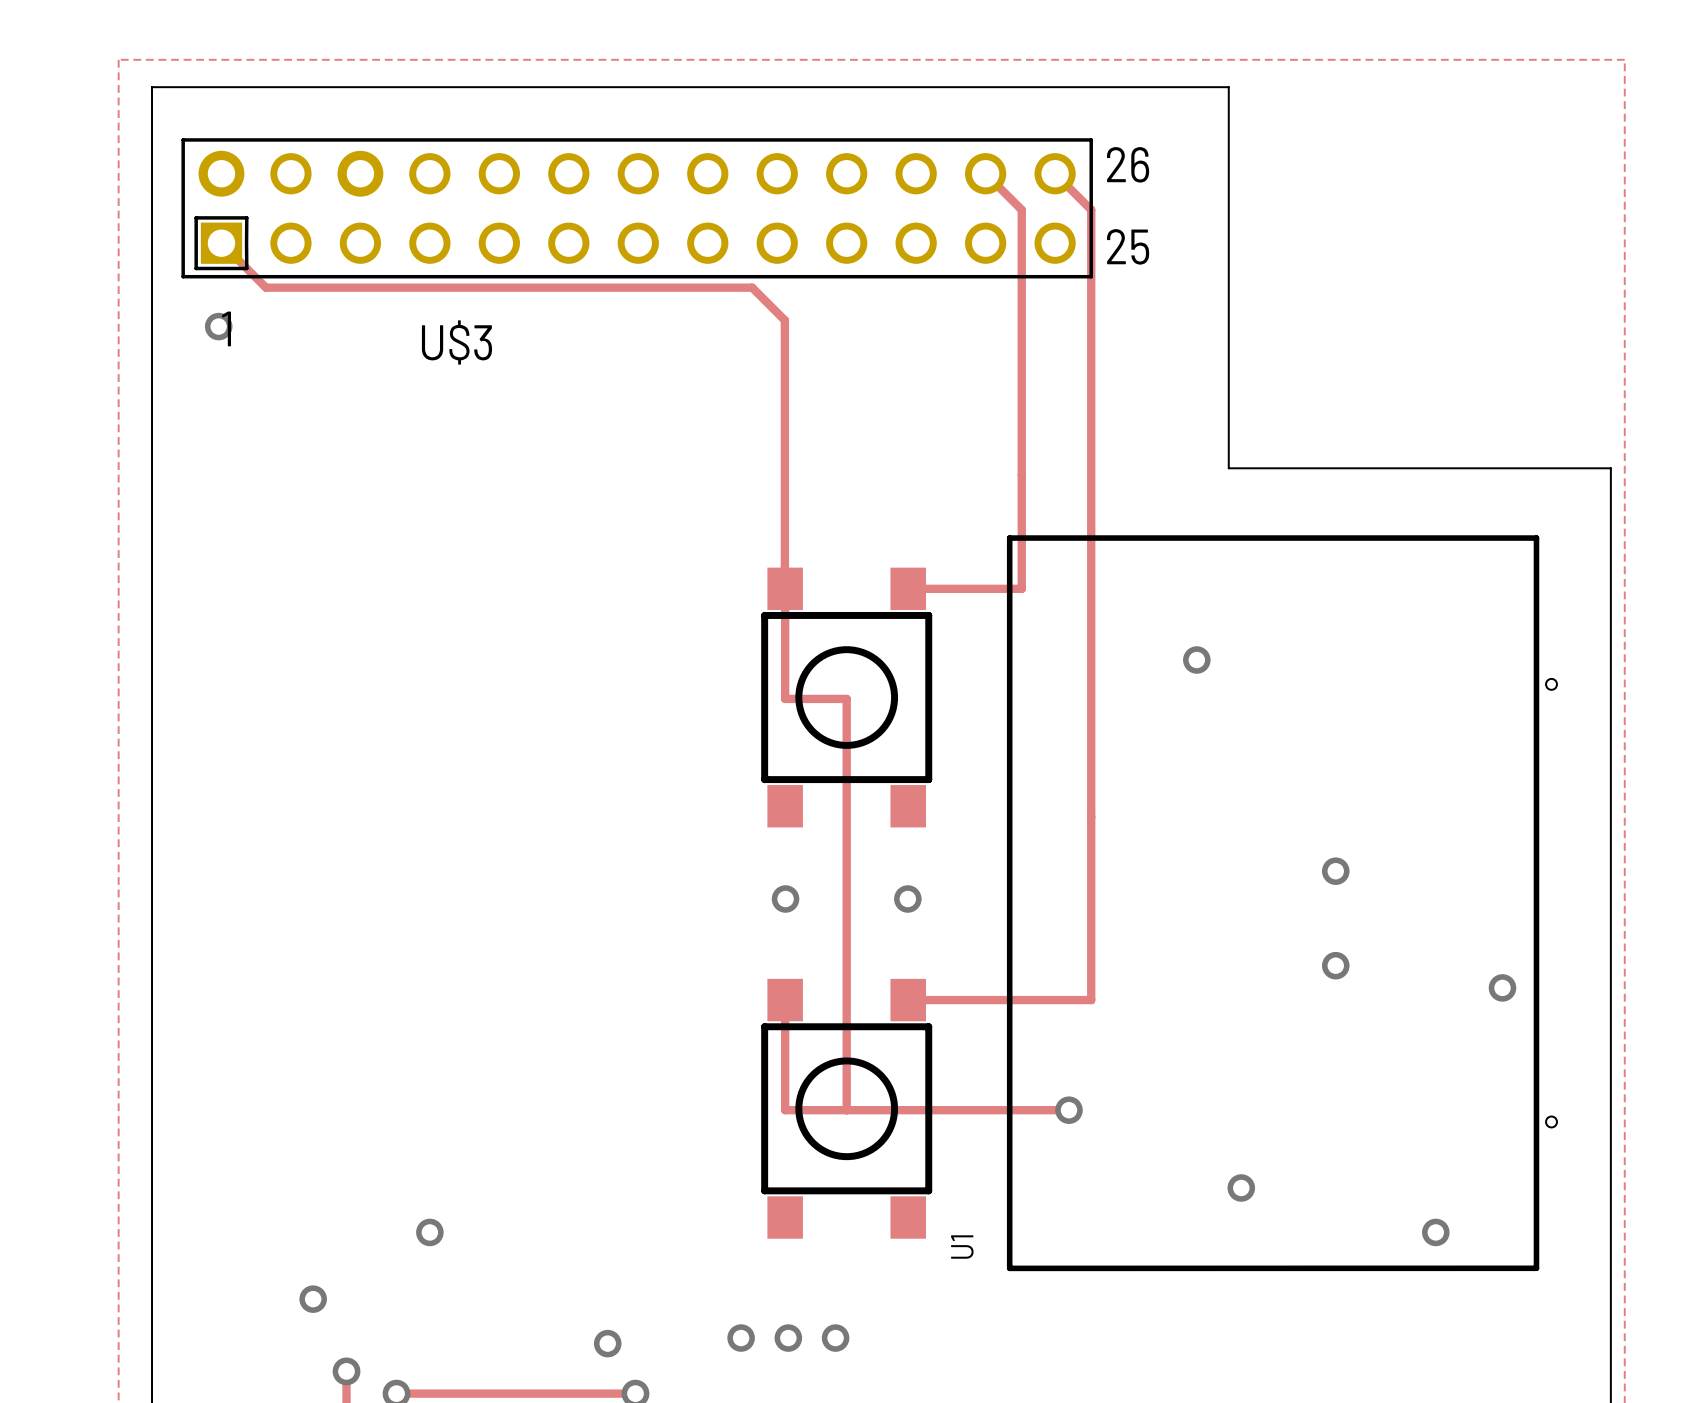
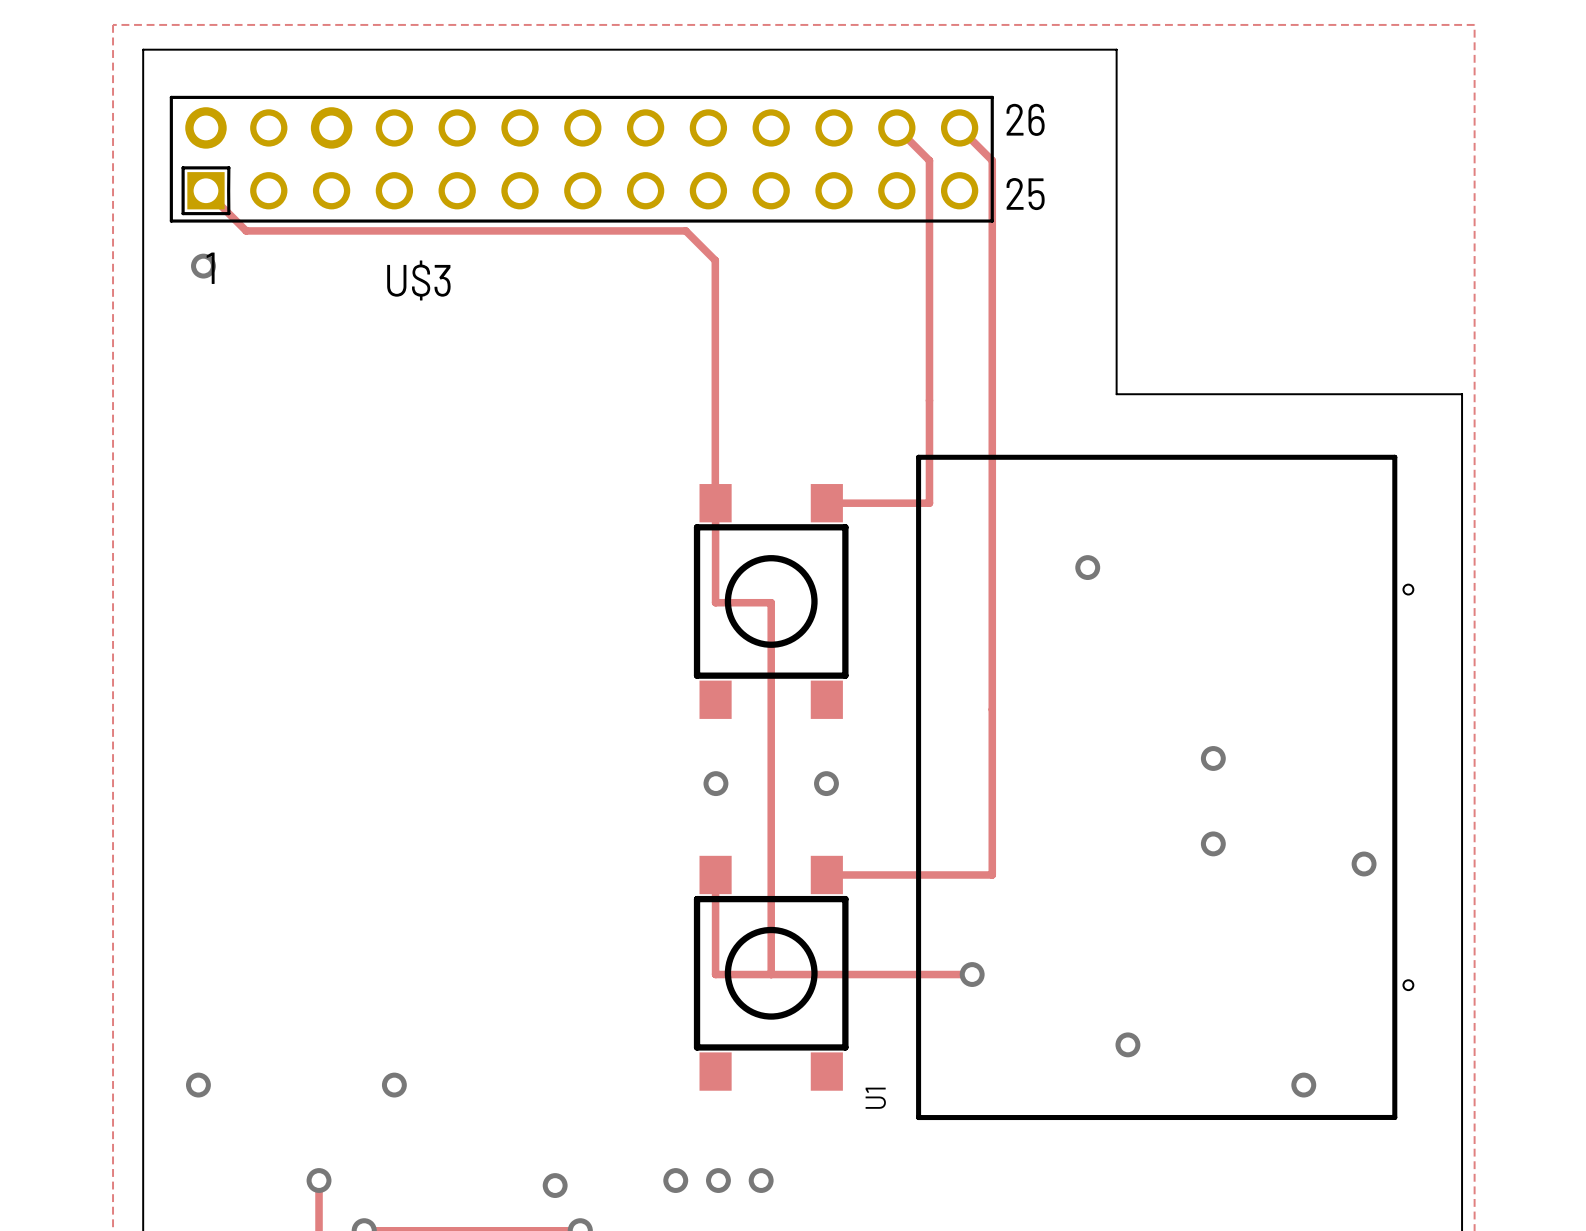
via: none -> (198, 1085)
via position: (313, 1299) -> (319, 1180)
track: none -> (319, 1180) (319, 1210)
via: (346, 1371) -> none

